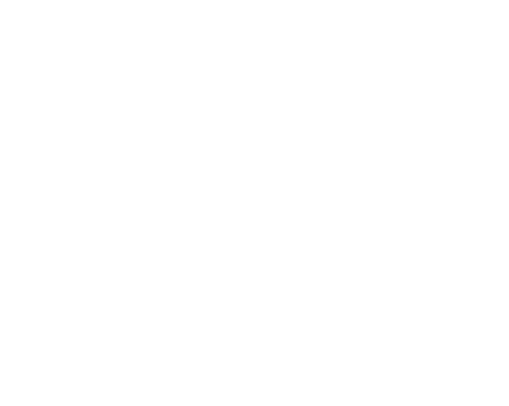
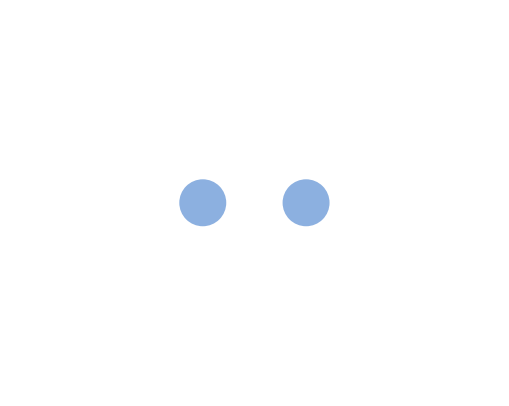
part: none -> (202, 202)
part: none -> (306, 202)

